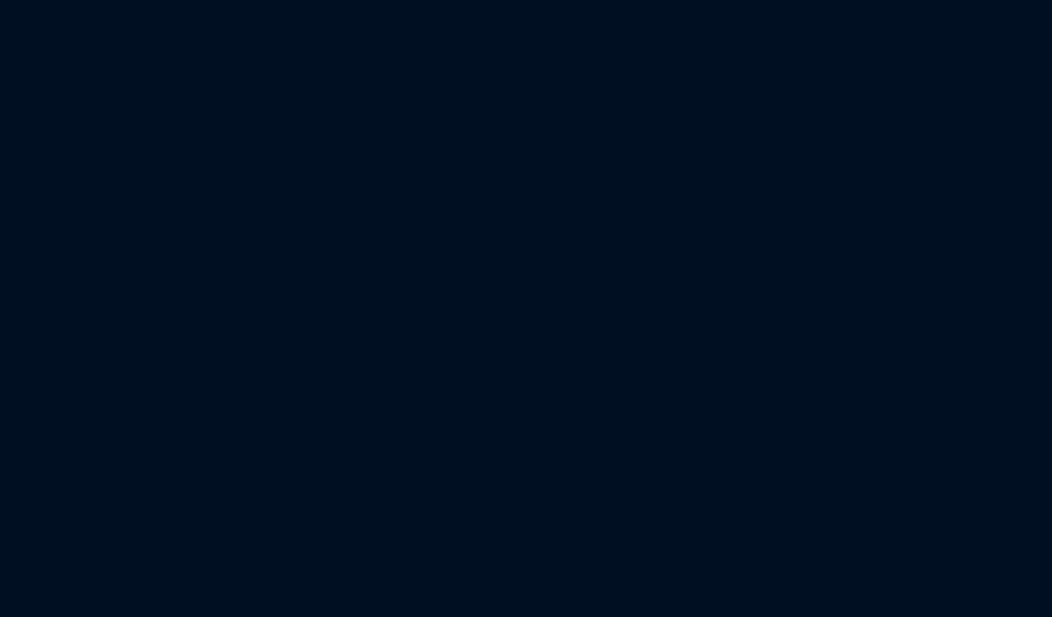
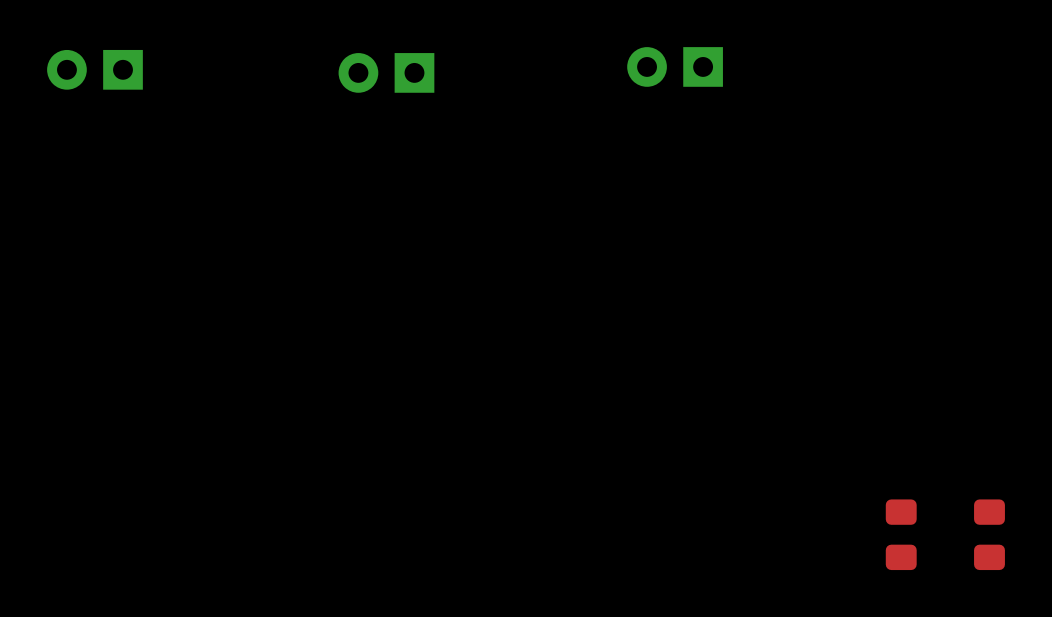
part: none -> (675, 66)
part: none -> (94, 69)
part: none -> (386, 72)
part: none -> (901, 534)
part: none -> (989, 534)

